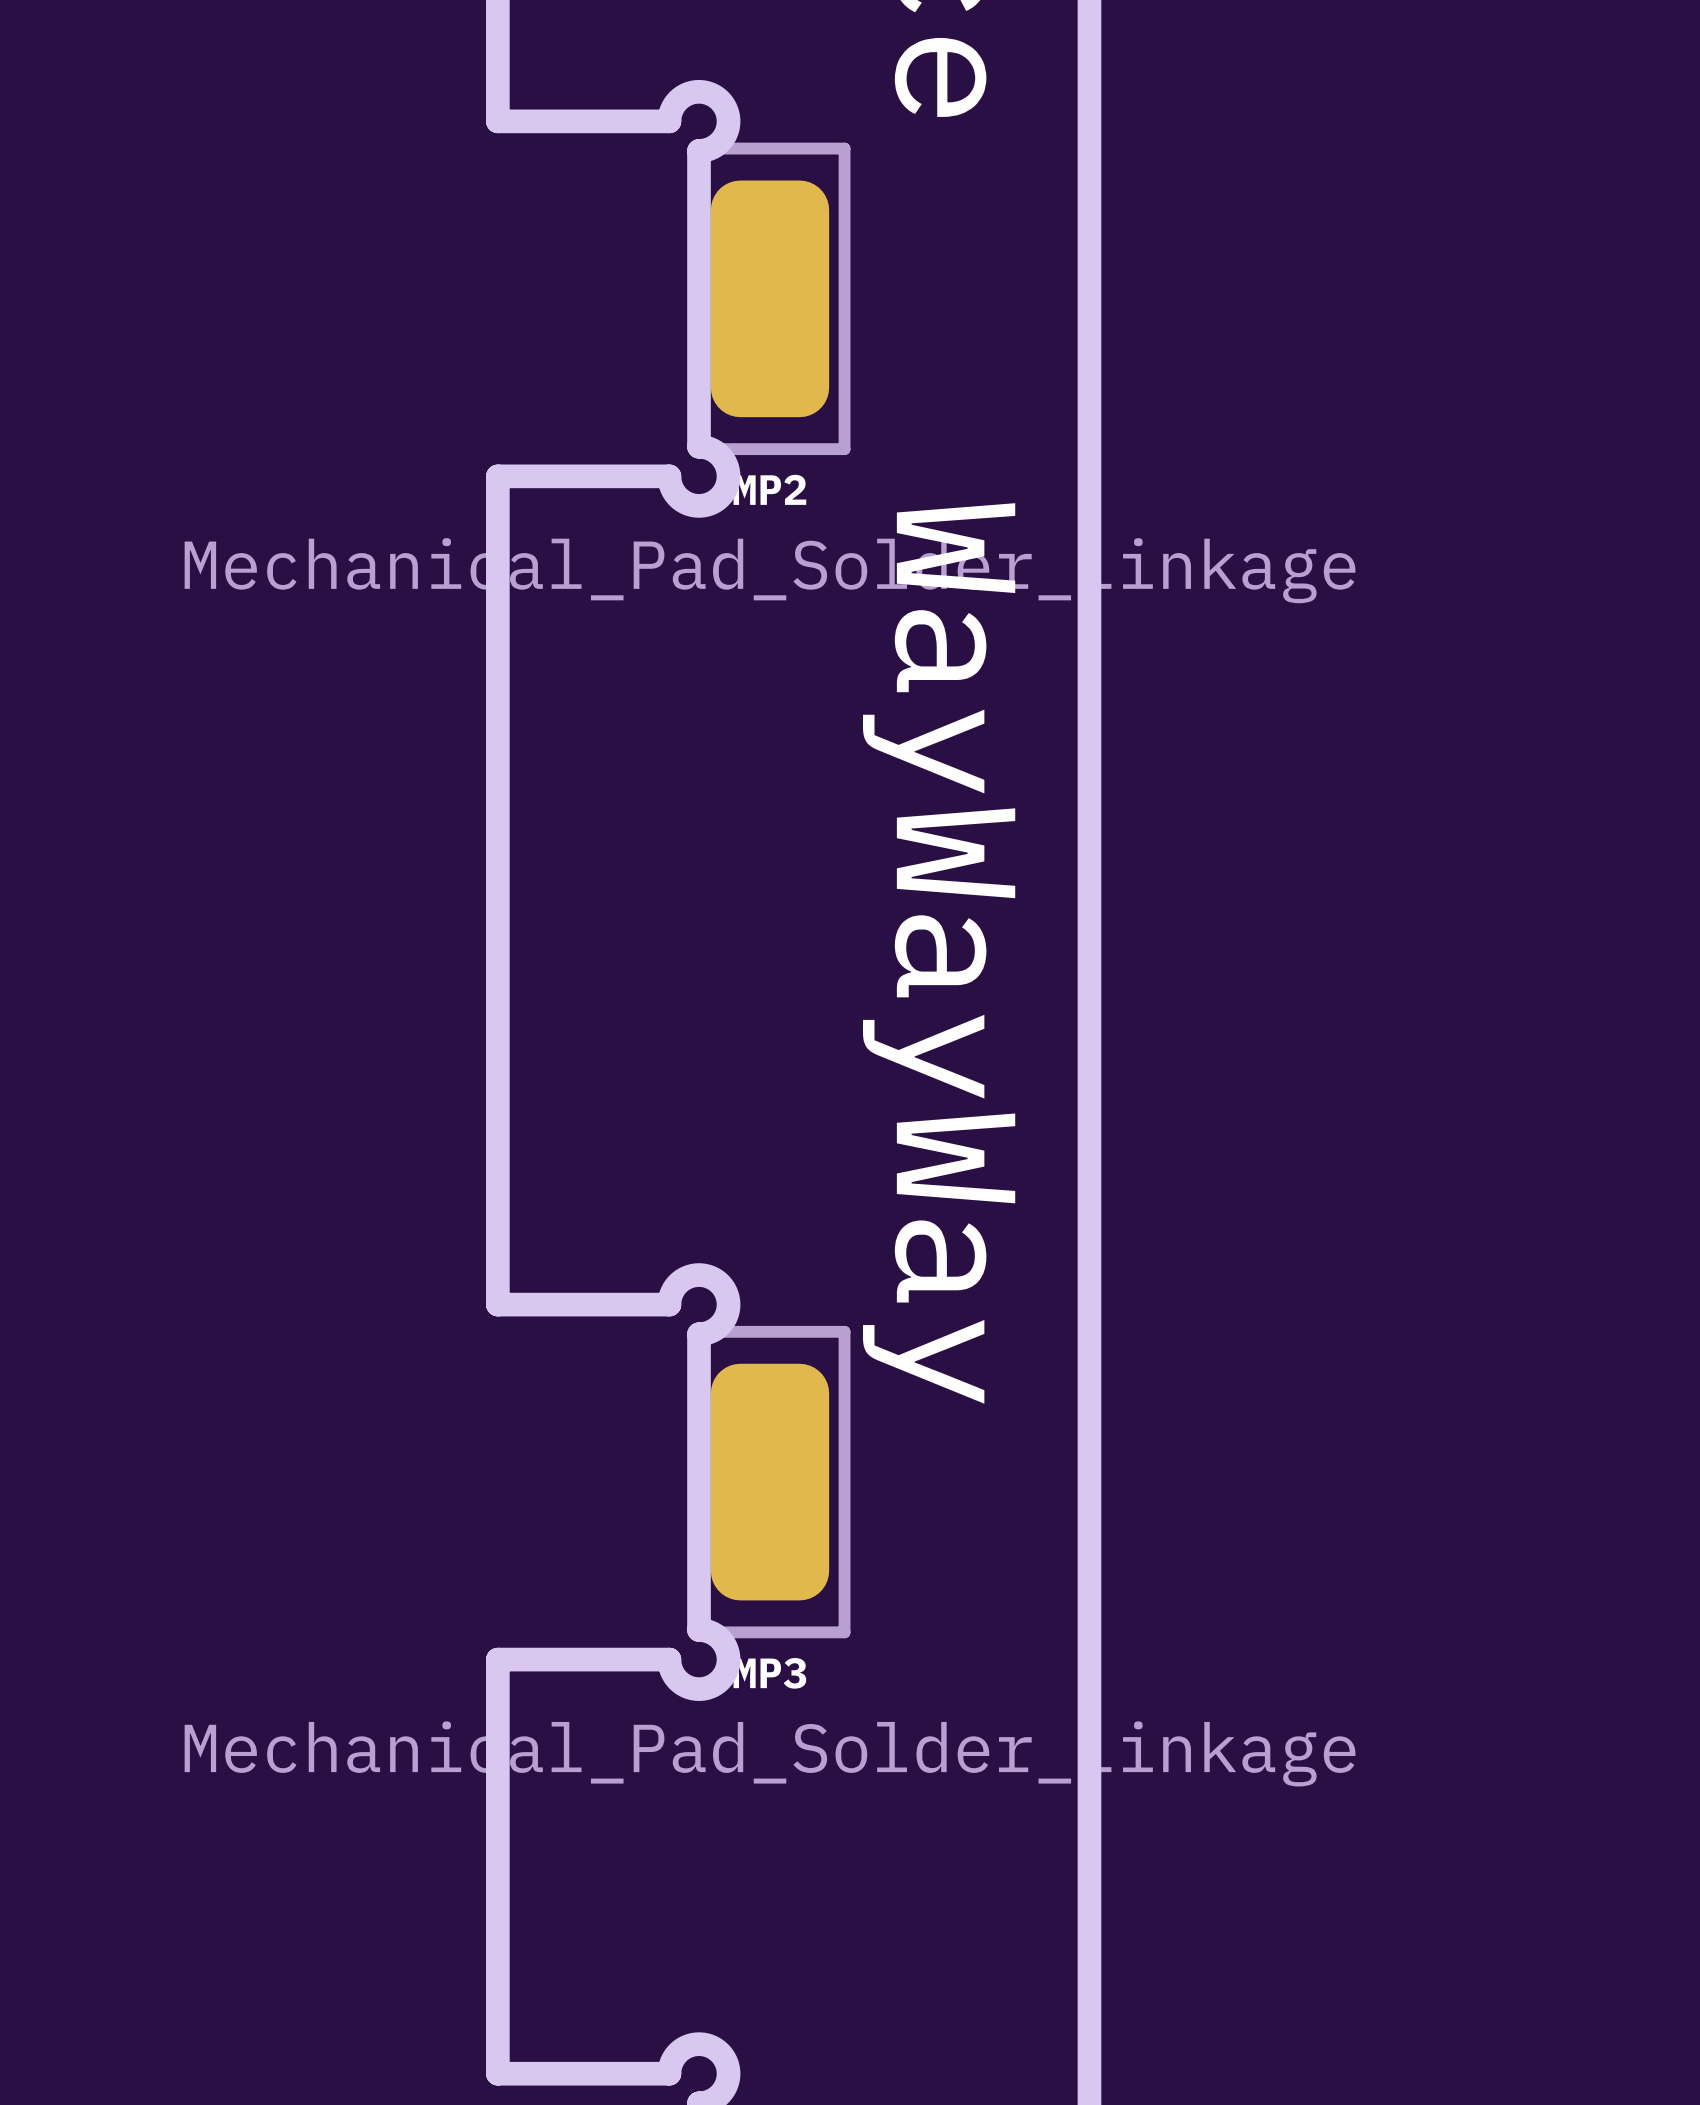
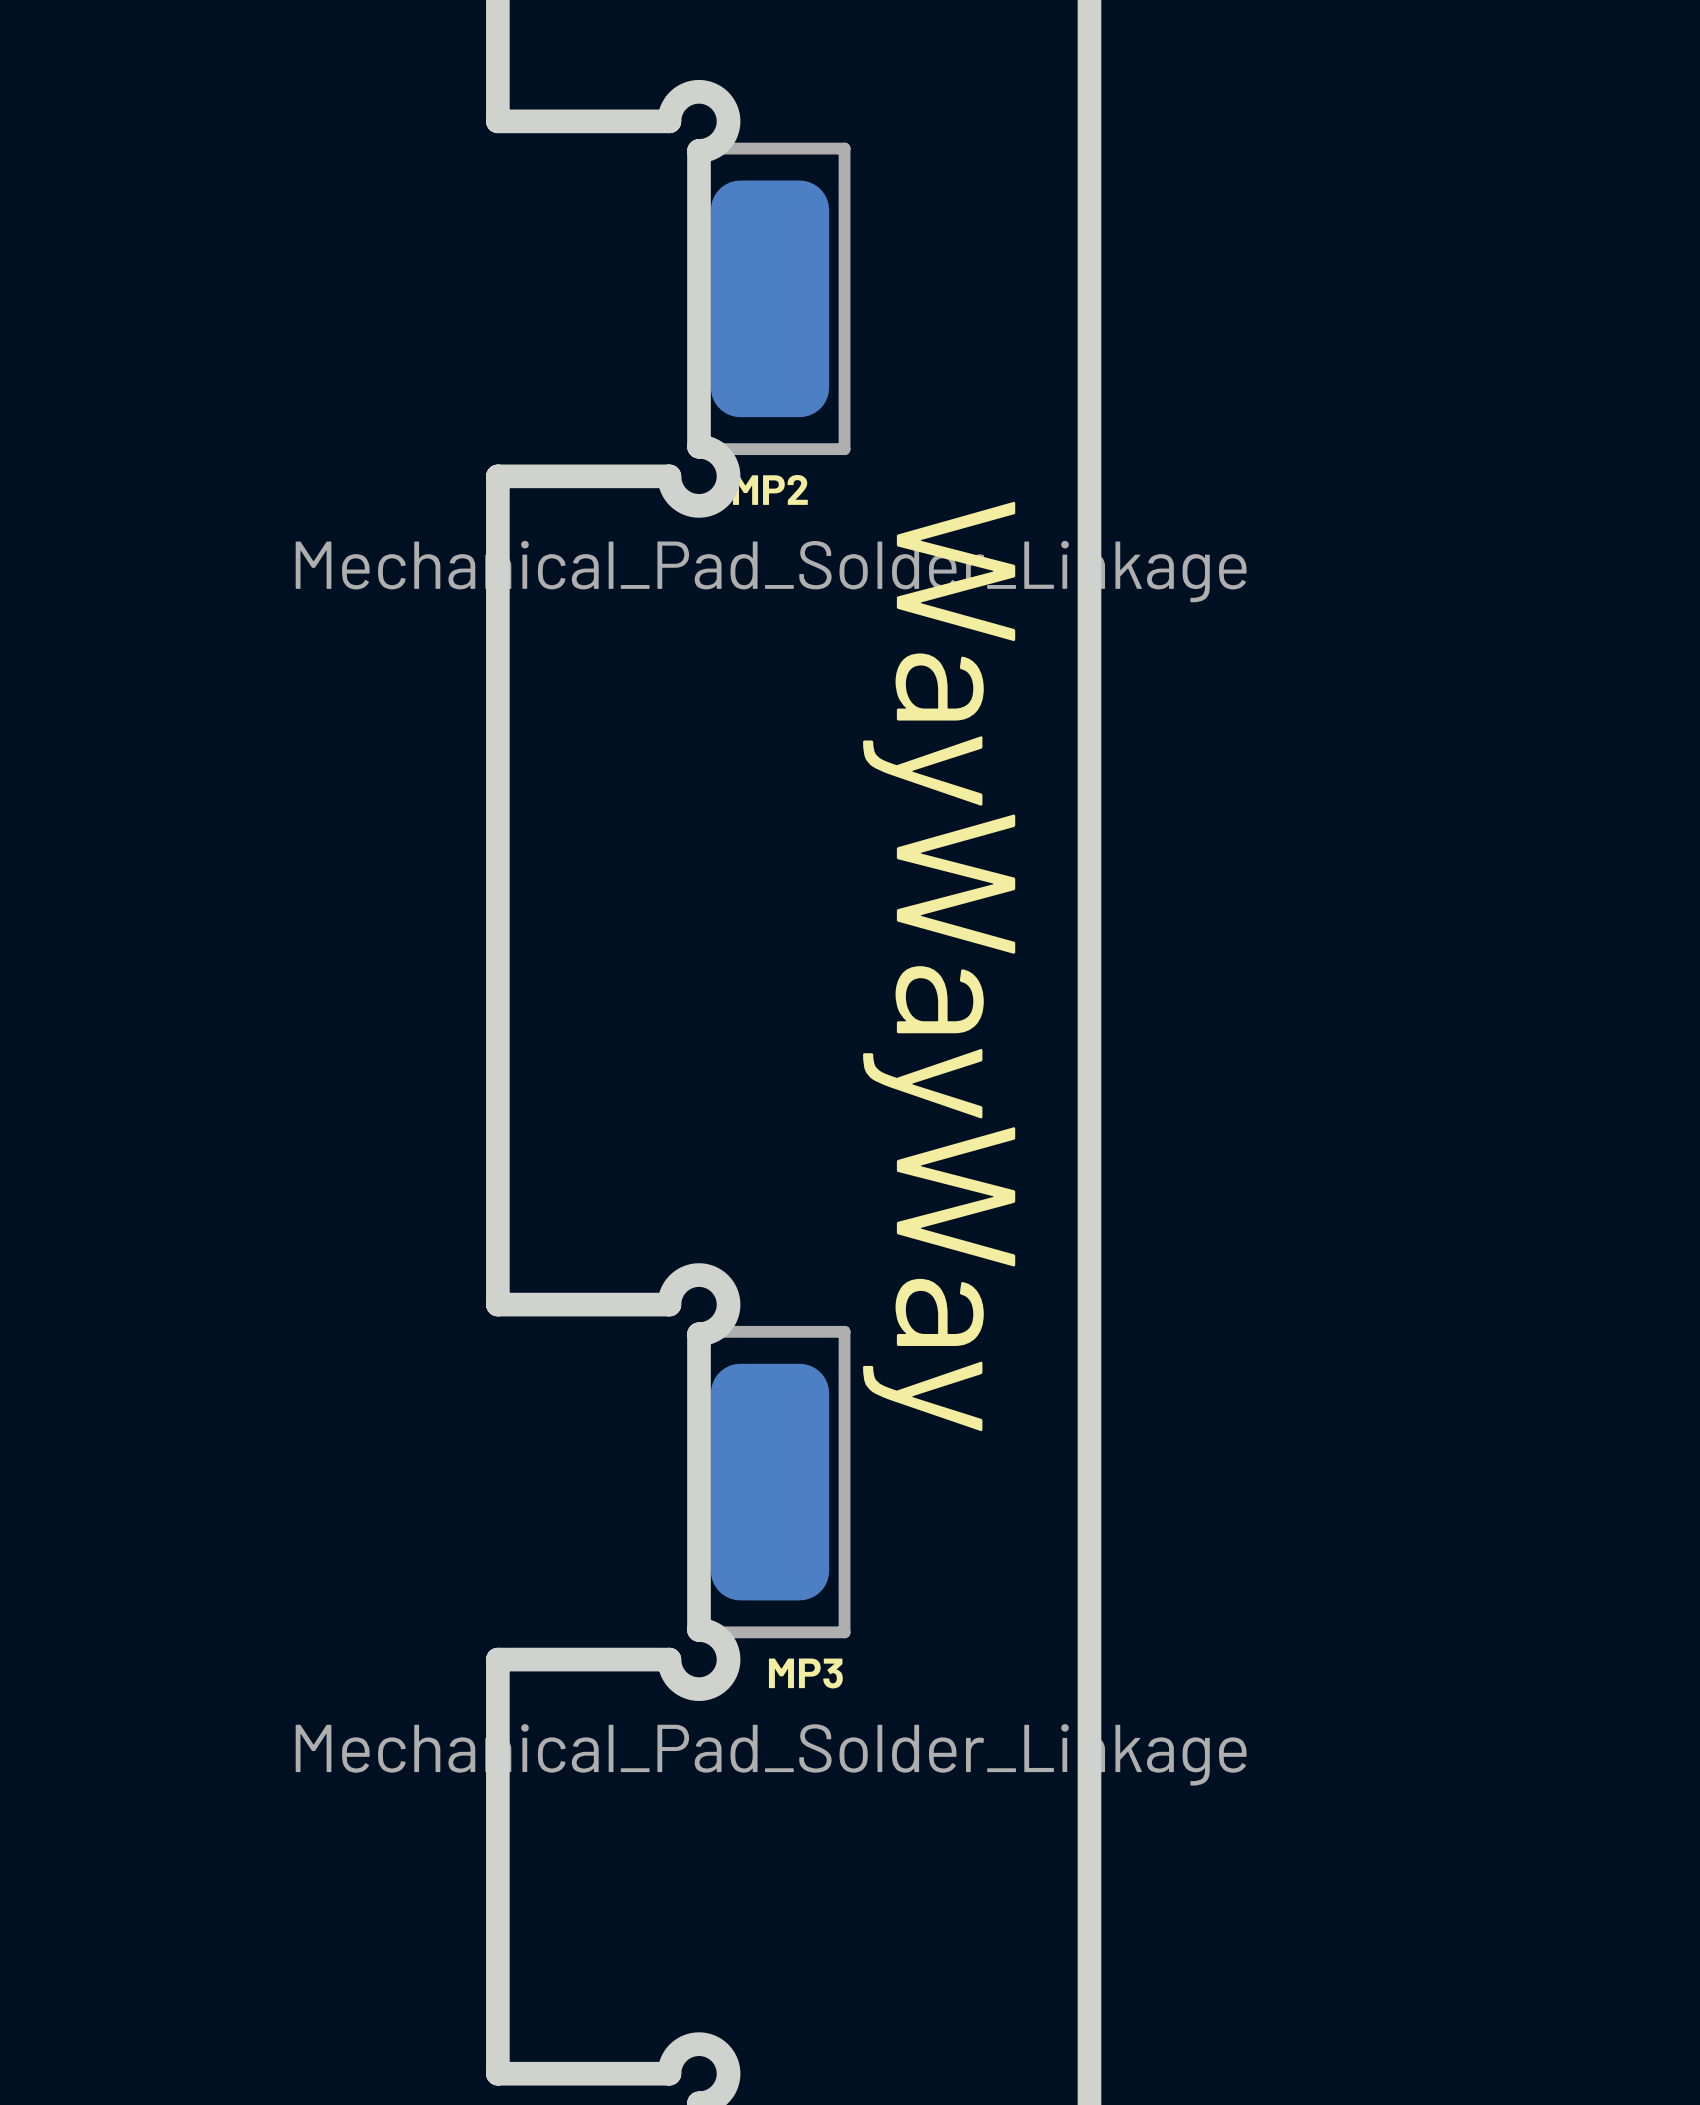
MP3 name position: MP3 (769, 1673) -> MP3 (805, 1673)

